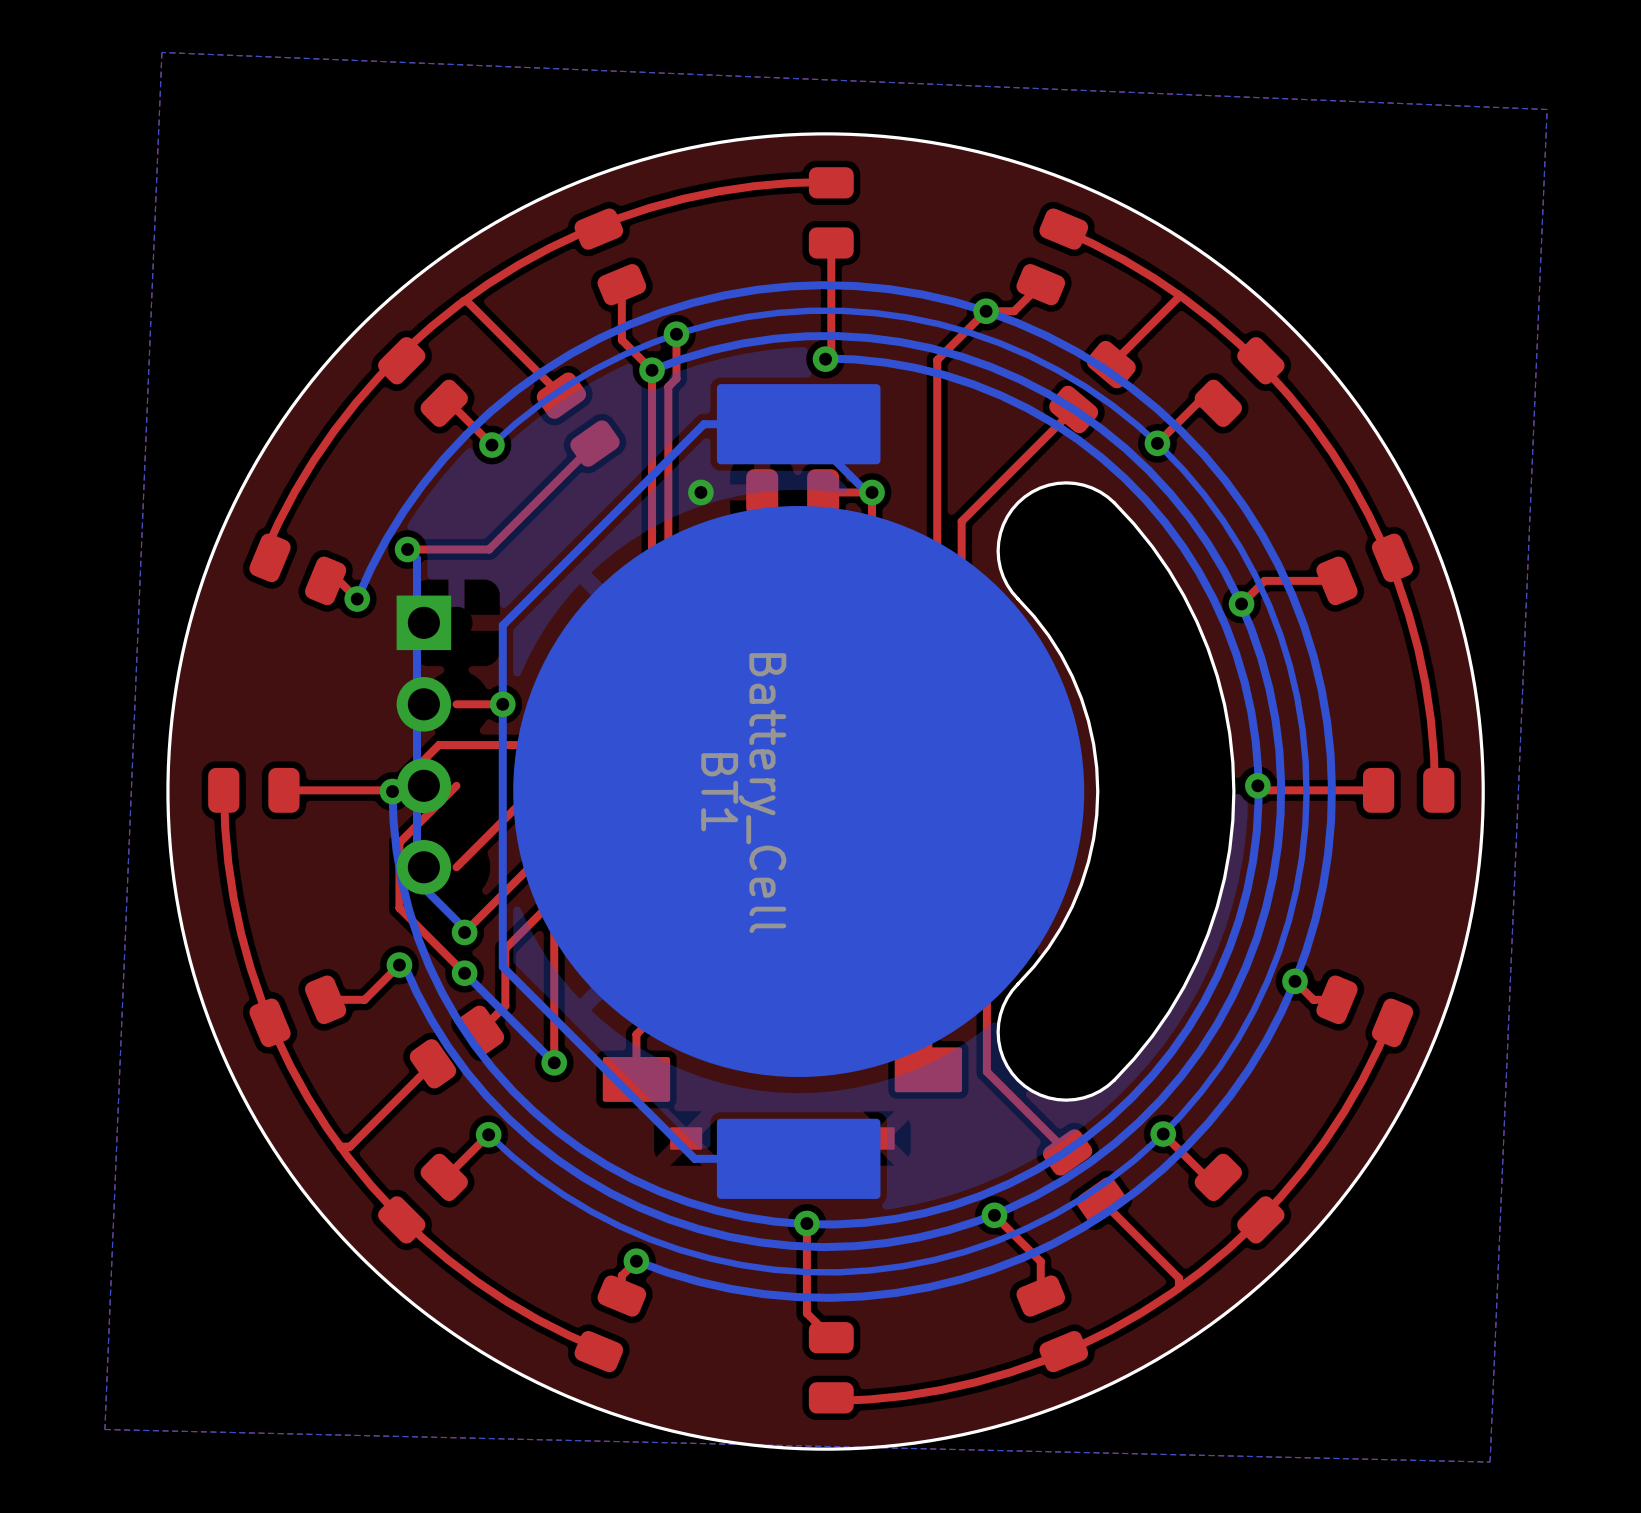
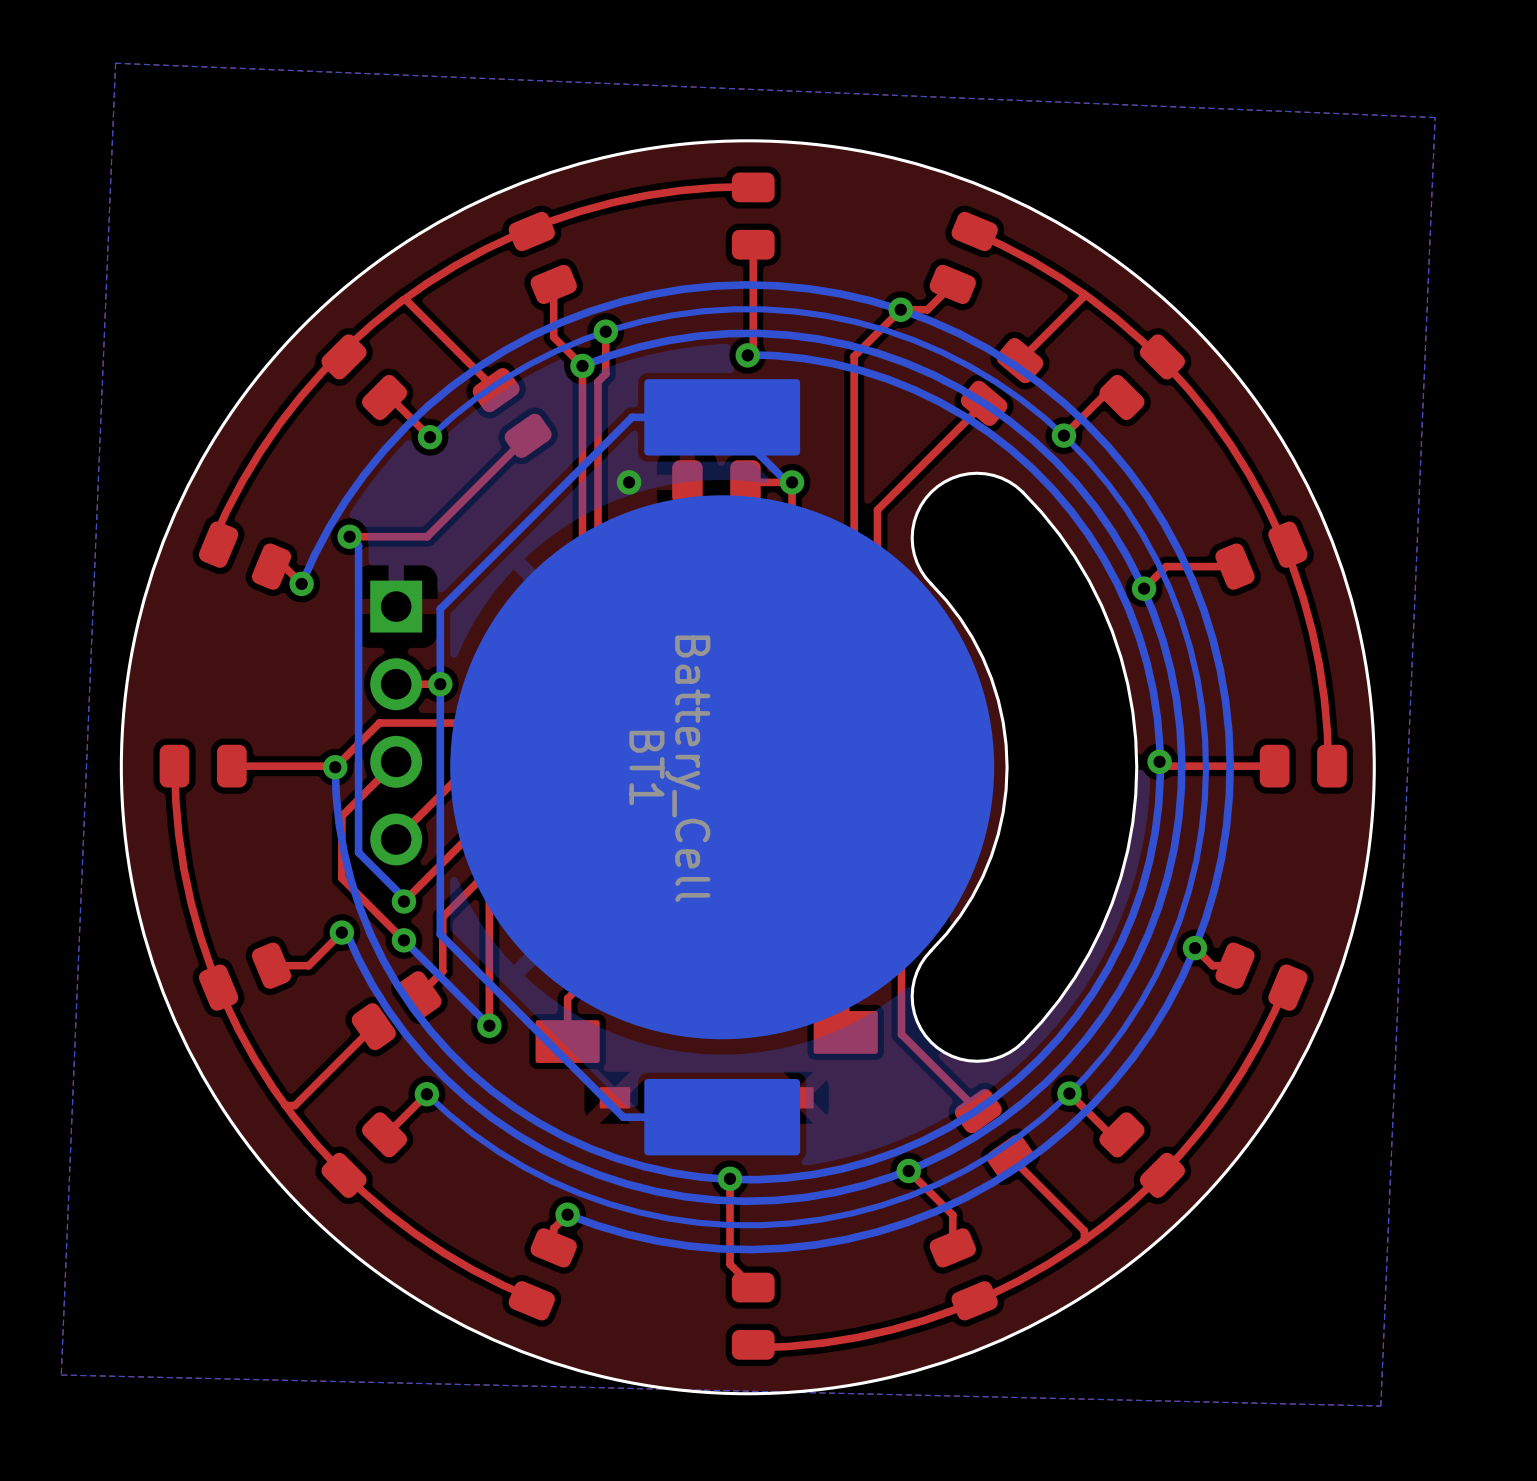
part position: (423, 745) -> (396, 723)

